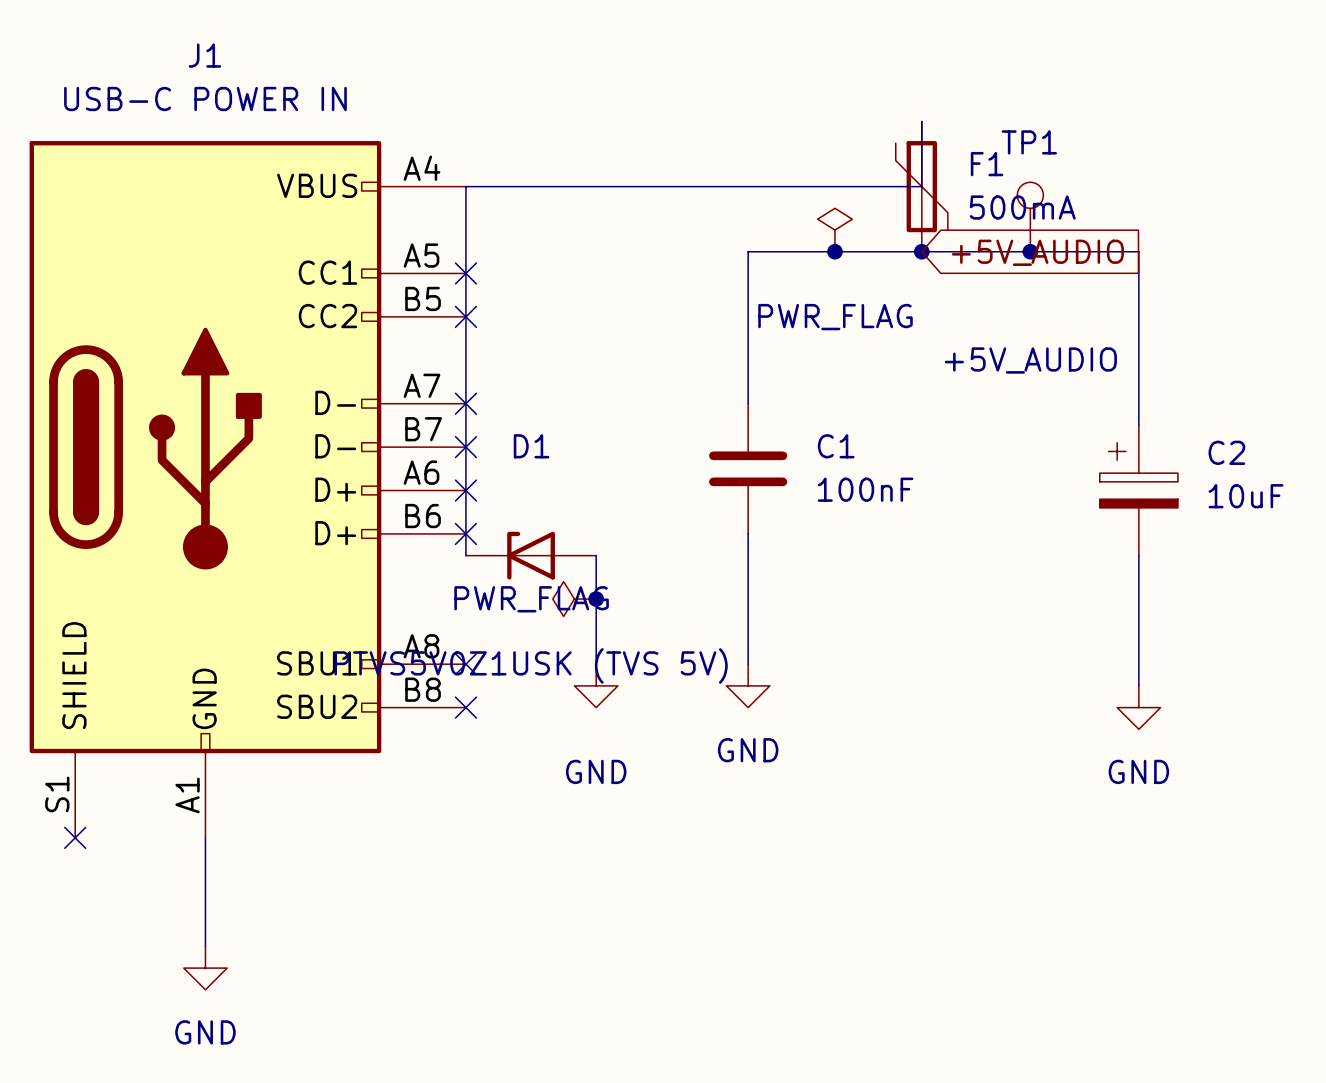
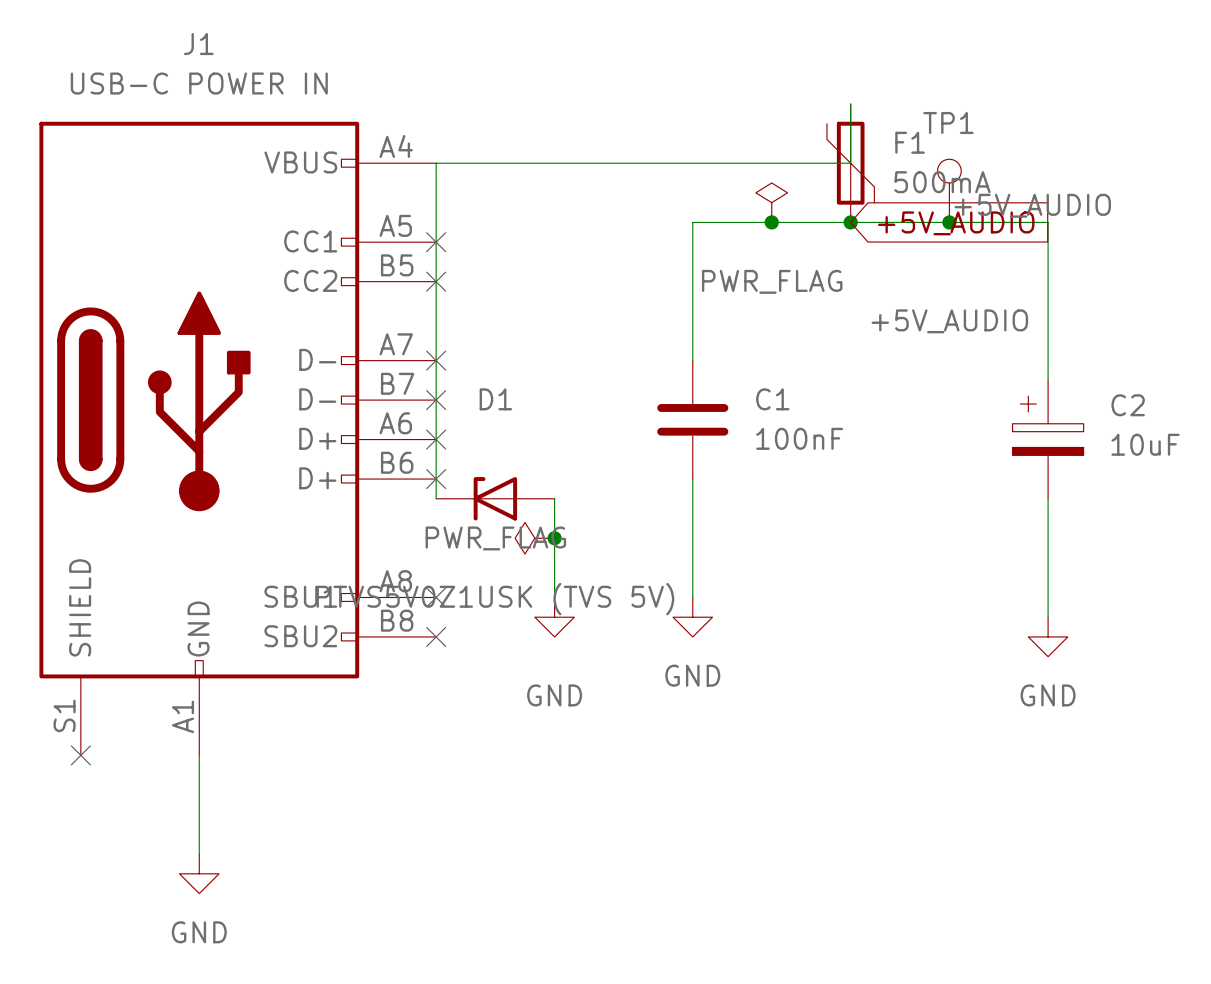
label: none -> +5V_AUDIO (1032, 205)

